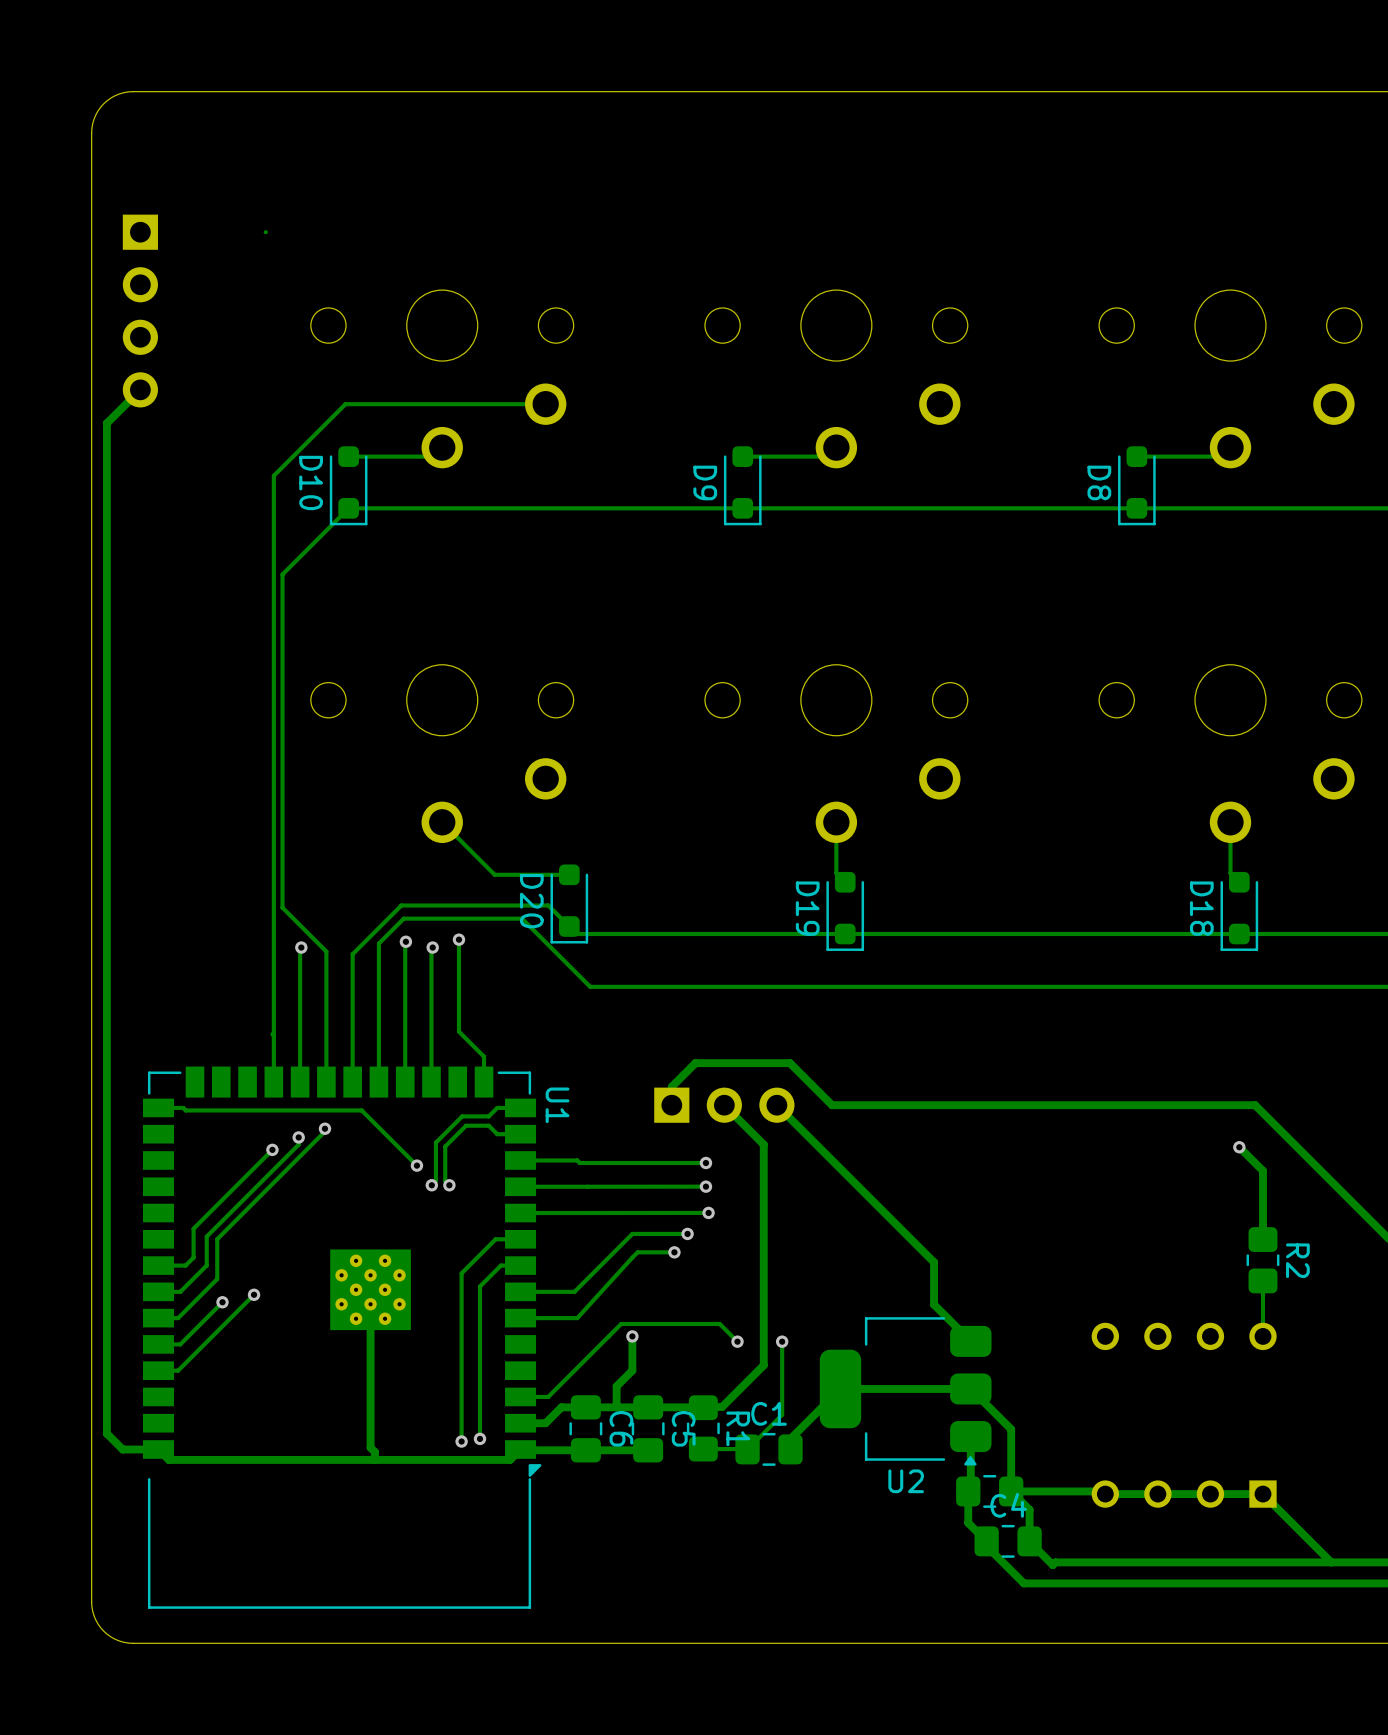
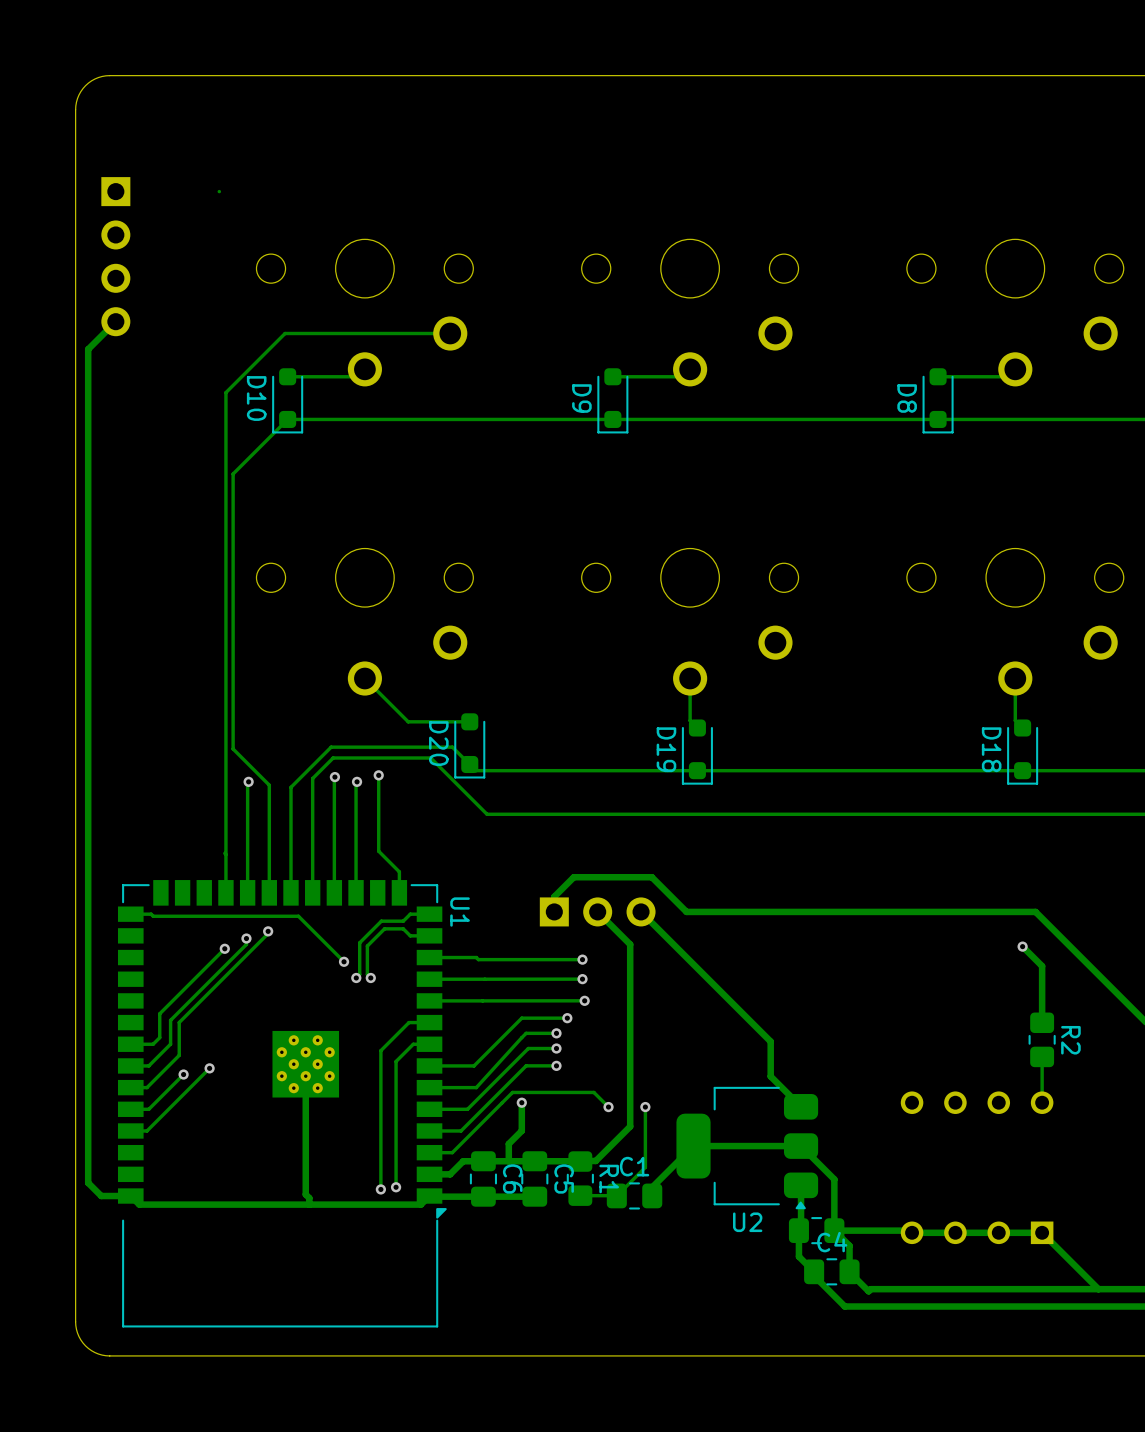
track: none -> (556, 1048) (528, 1048) (467, 1109) (429, 1109)
via: none -> (556, 1048)
track: none -> (556, 1065) (526, 1065) (461, 1130) (429, 1130)
via: none -> (556, 1065)

